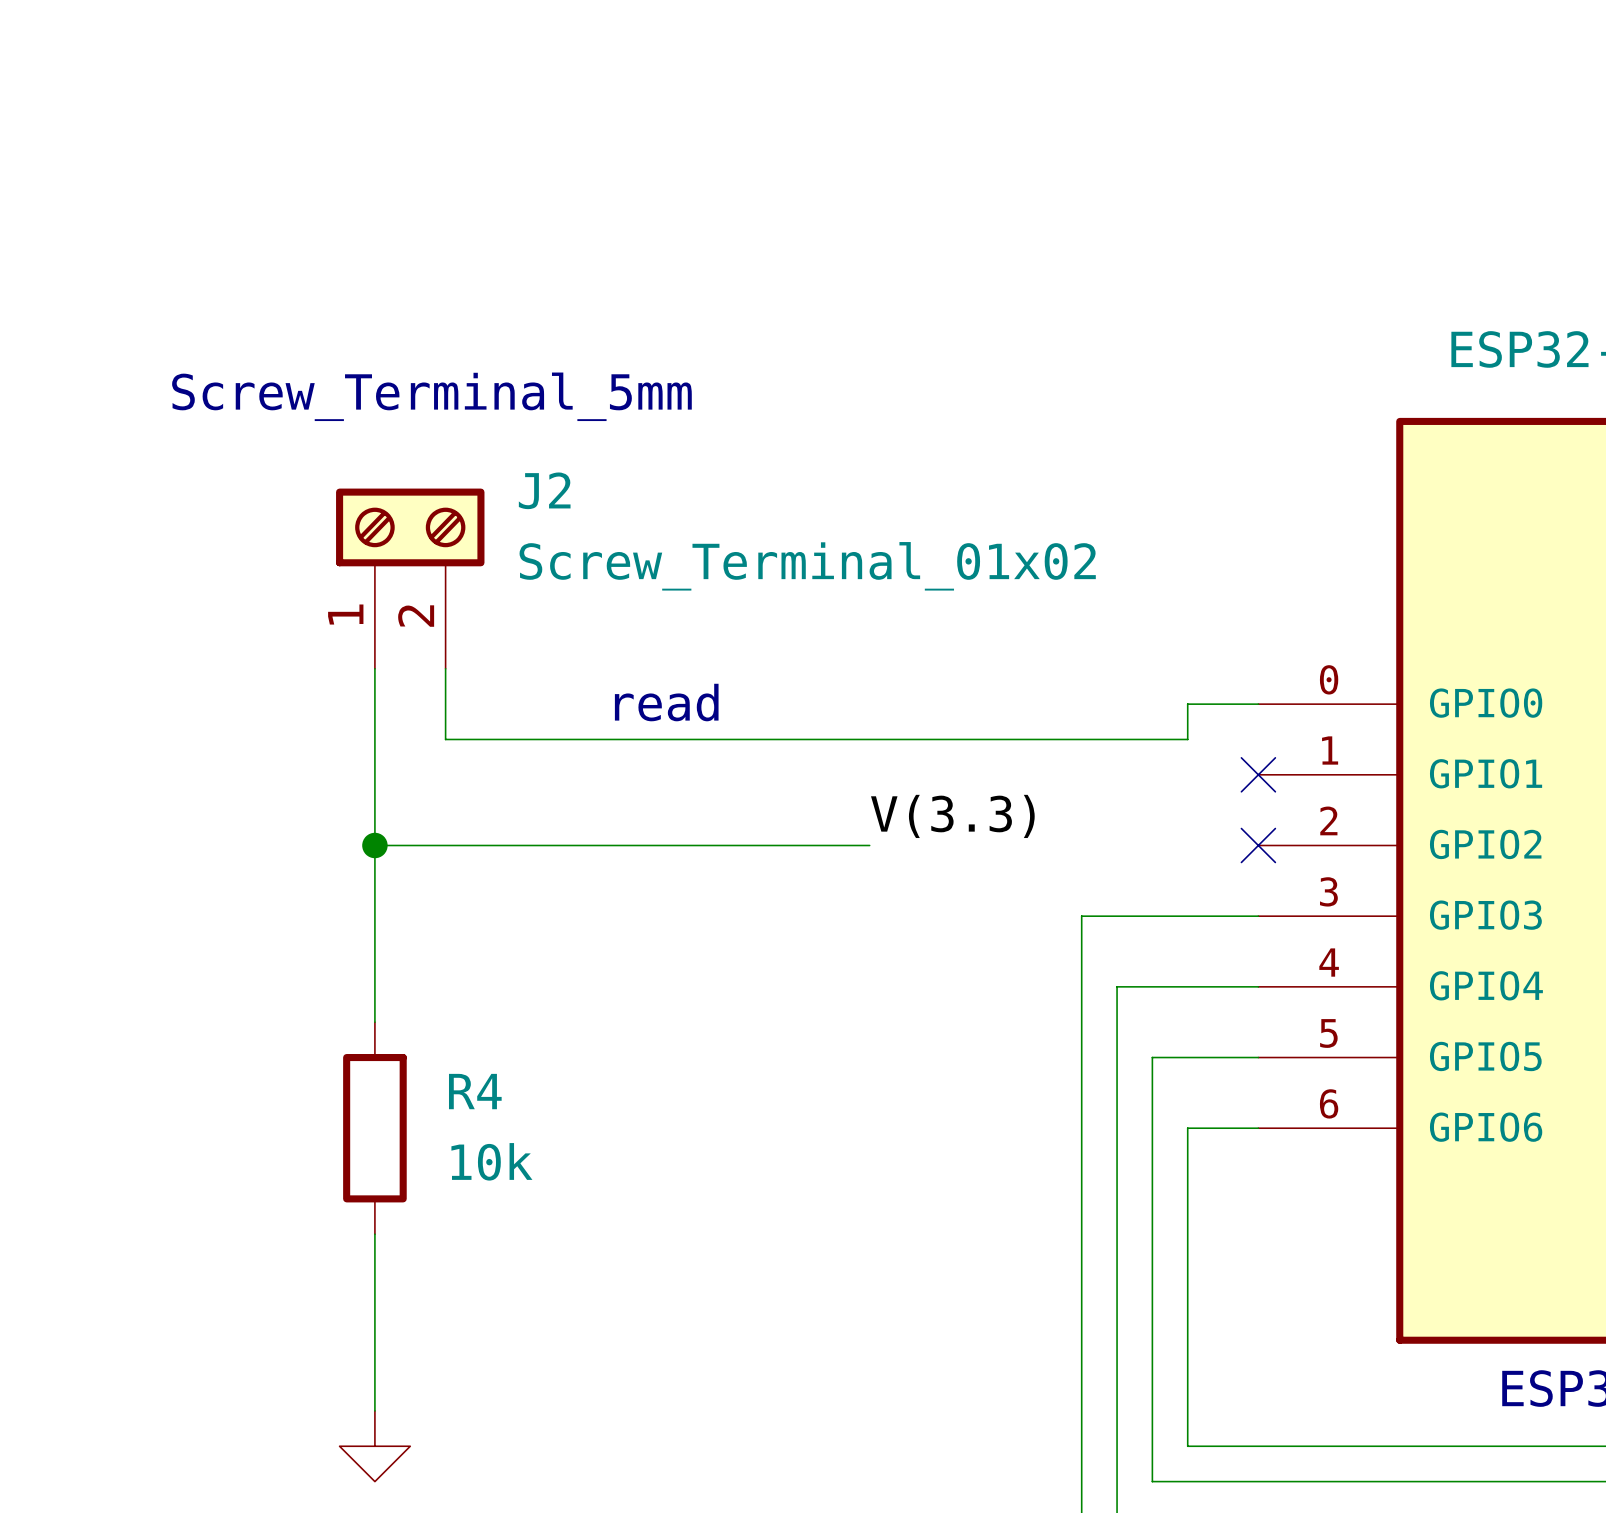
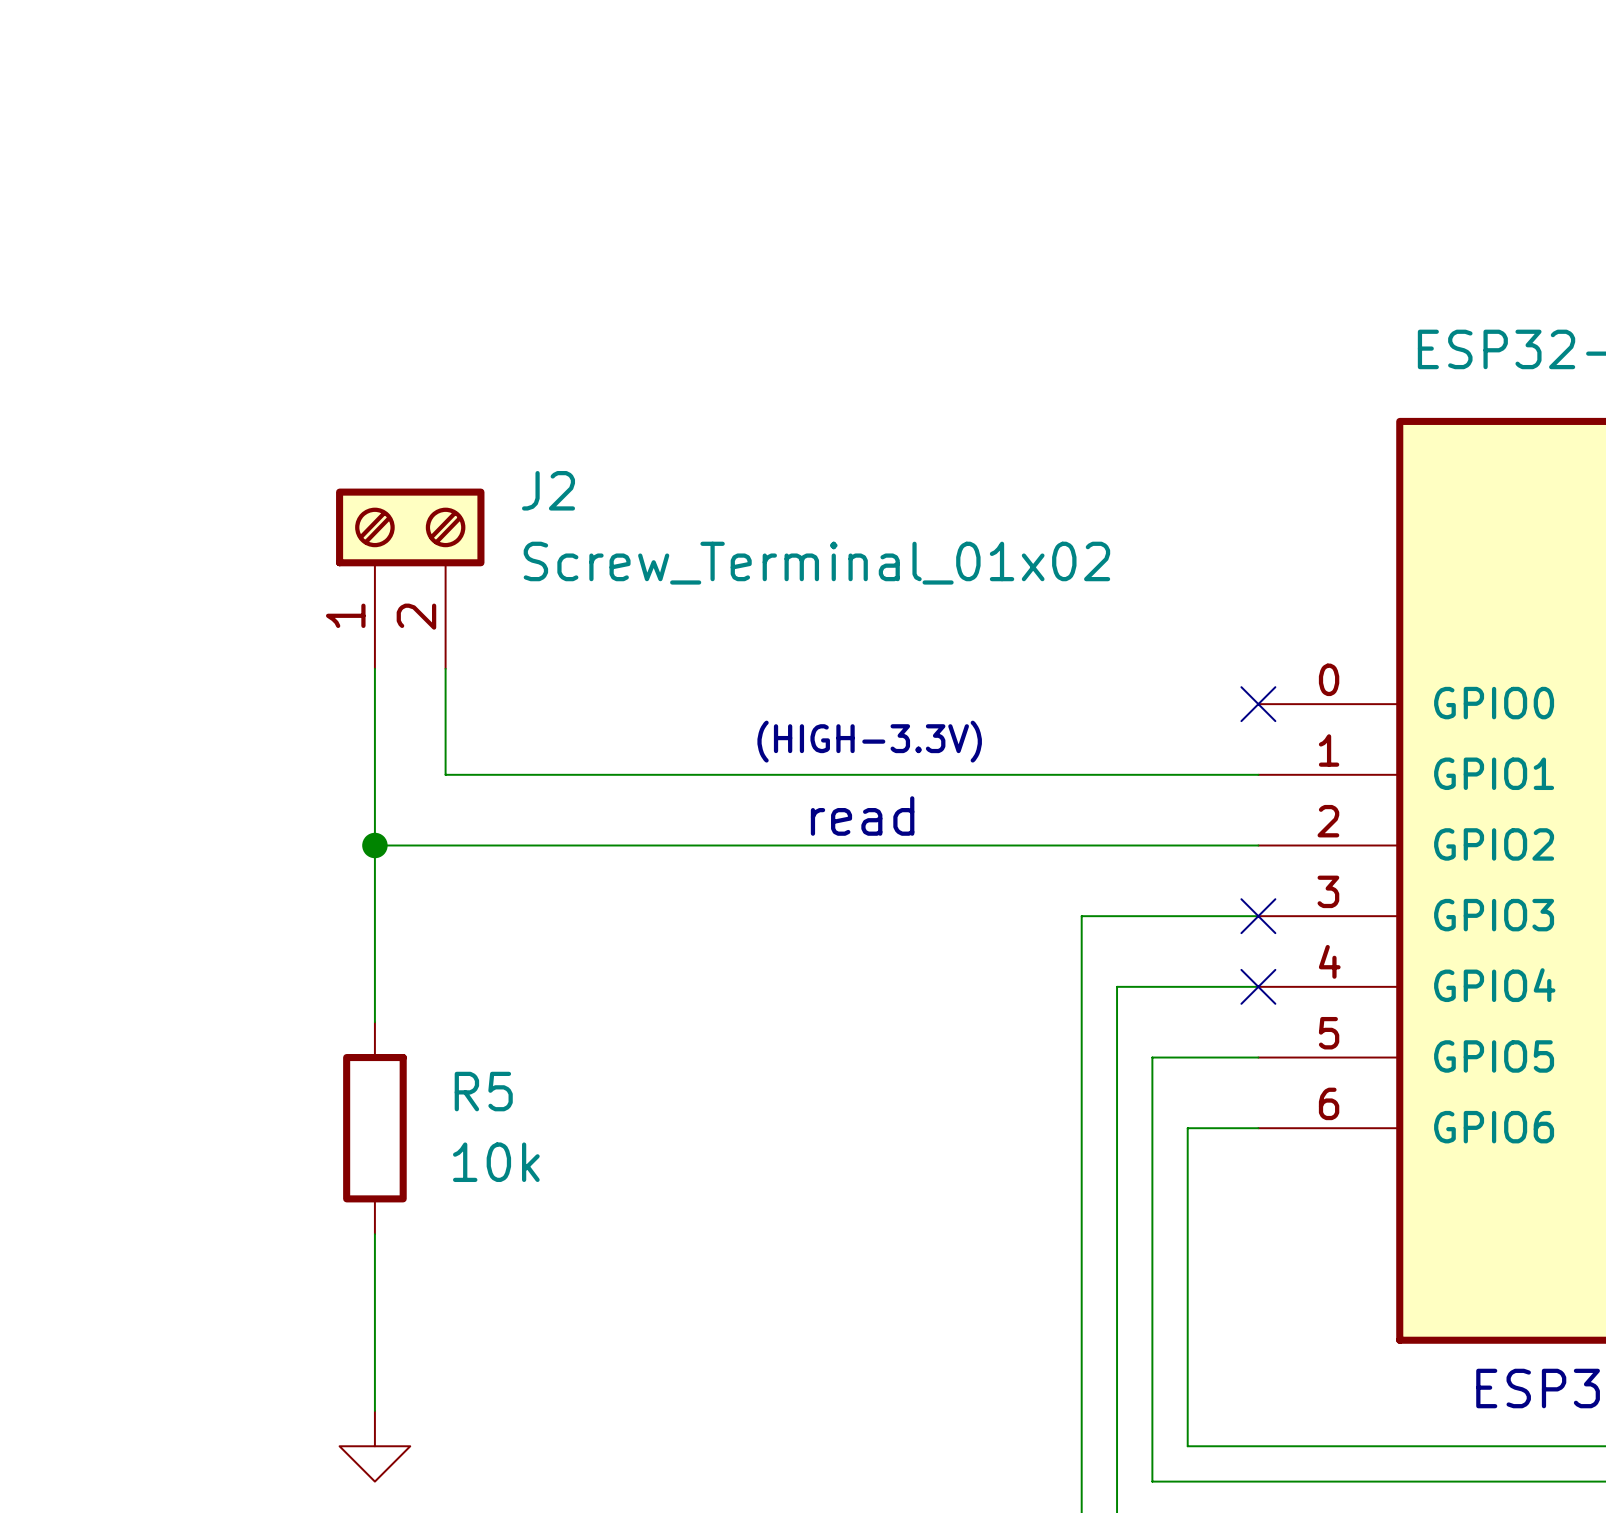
text: Screw_Terminal_5mm (431, 396) -> none
text position: read (666, 702) -> read (862, 816)
wire: (1258, 704) (1187, 704) (1187, 739) (445, 739) -> (1258, 774) (445, 774) (445, 739)
no-connect mark: none -> (1258, 704)
text: none -> (HIGH-3.3V) (869, 741)
no-connect mark: (1258, 774) -> none
label: V(3.3) (952, 816) -> none
wire: none -> (869, 845) (1258, 845)
no-connect mark: (1258, 845) -> none
no-connect mark: none -> (1258, 916)
no-connect mark: none -> (1258, 986)
R4 name: R4 (475, 1091) -> R5 (483, 1091)

